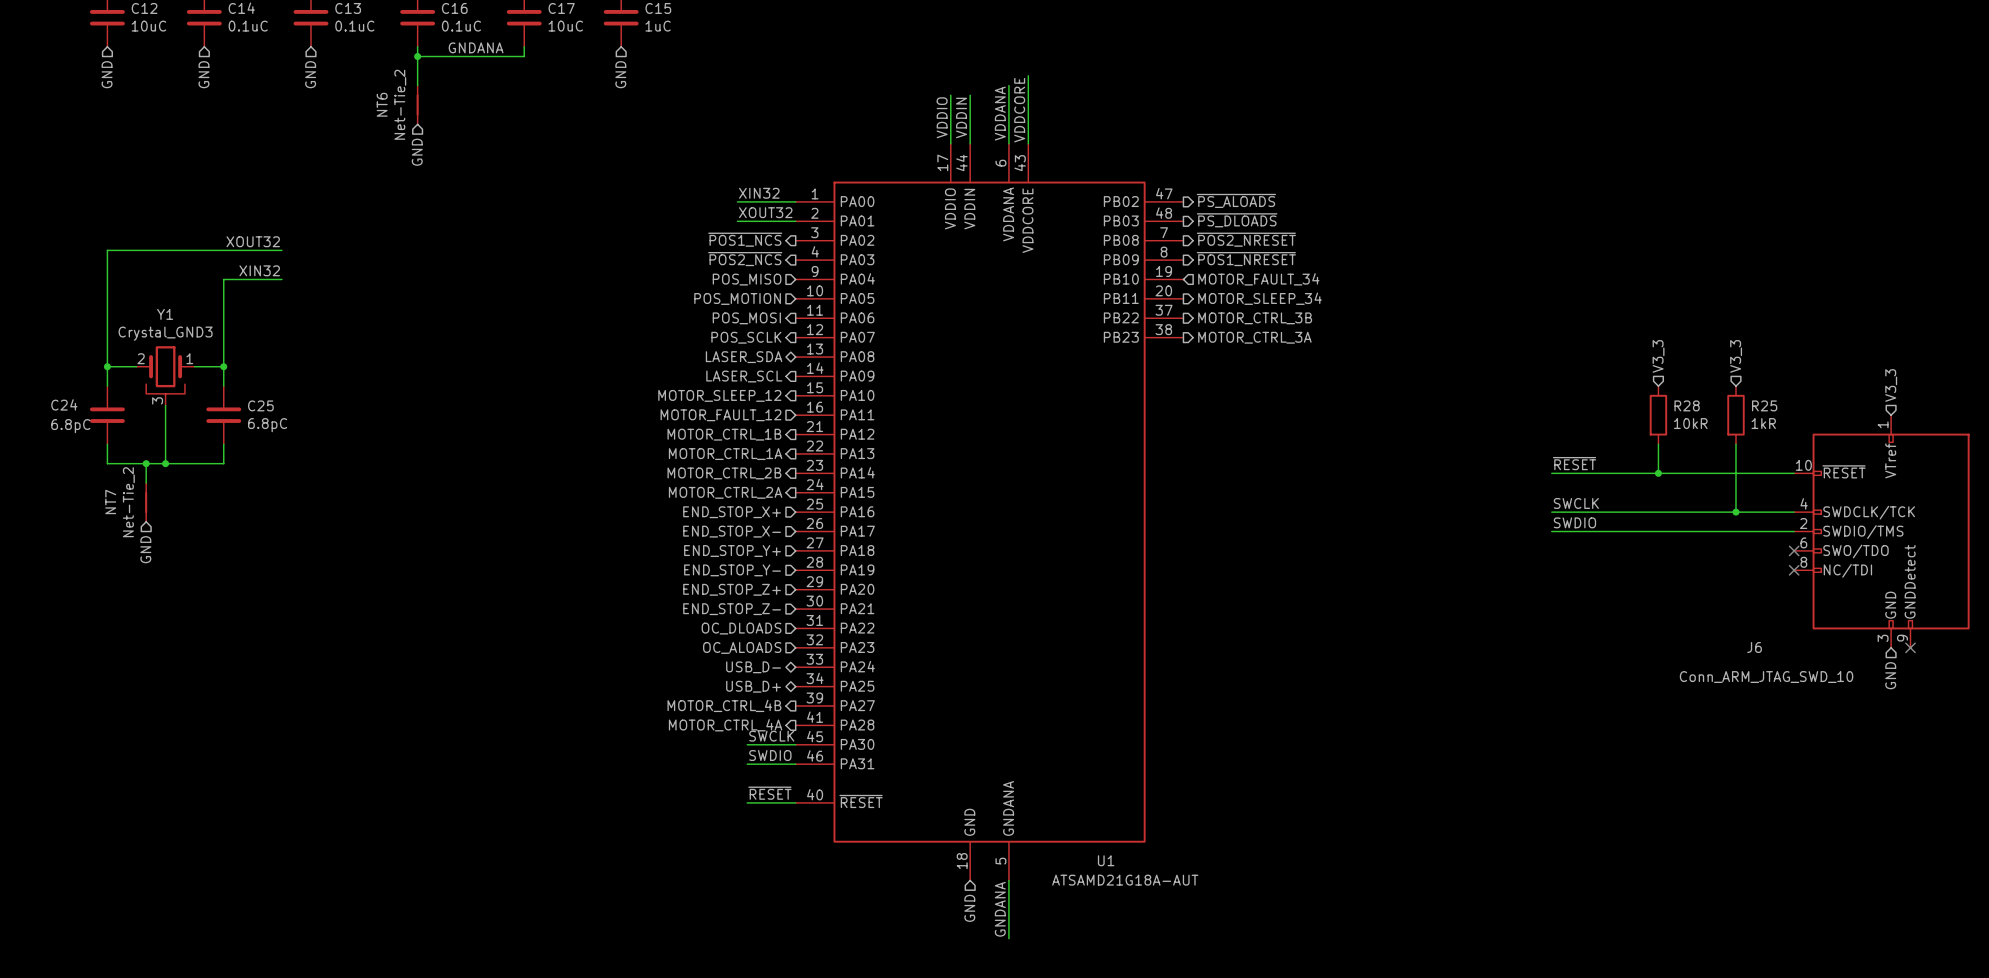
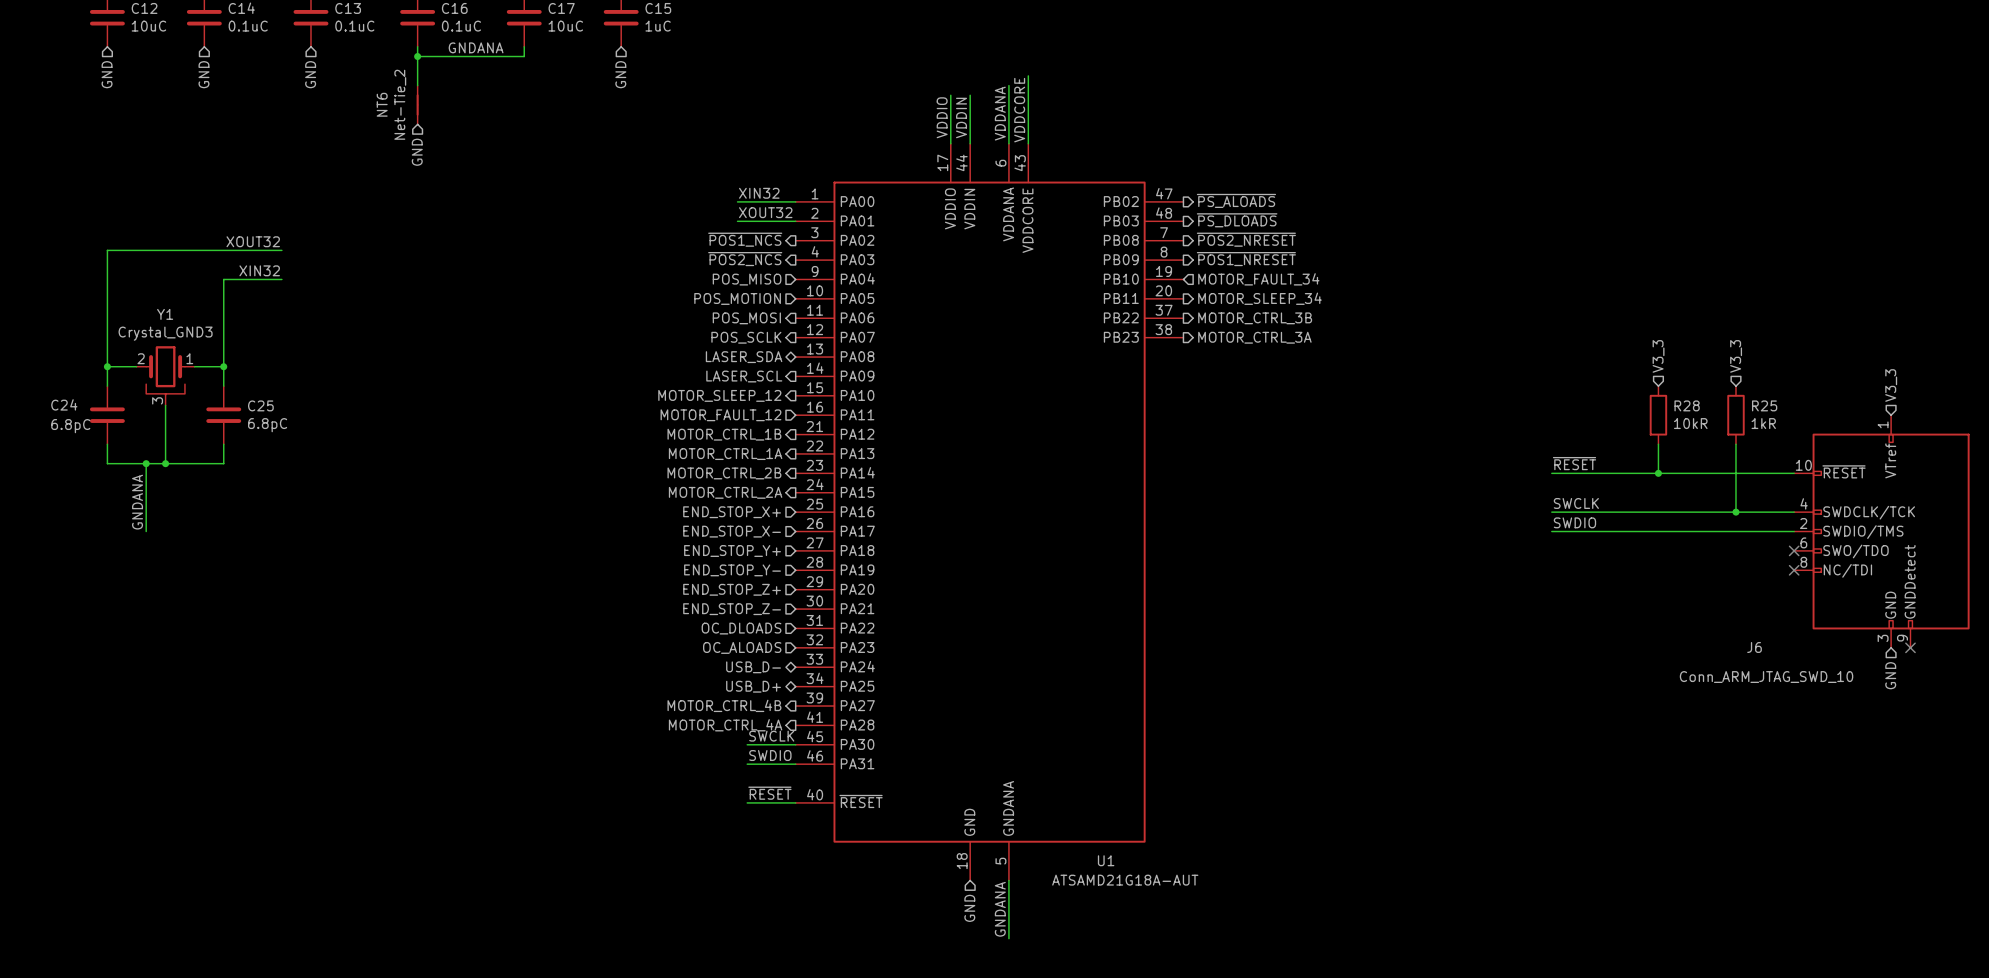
label: none -> GNDANA (137, 502)
NT7: Net-Tie_2 (146, 502) -> none
hierarchical label: GND (145, 549) -> none

